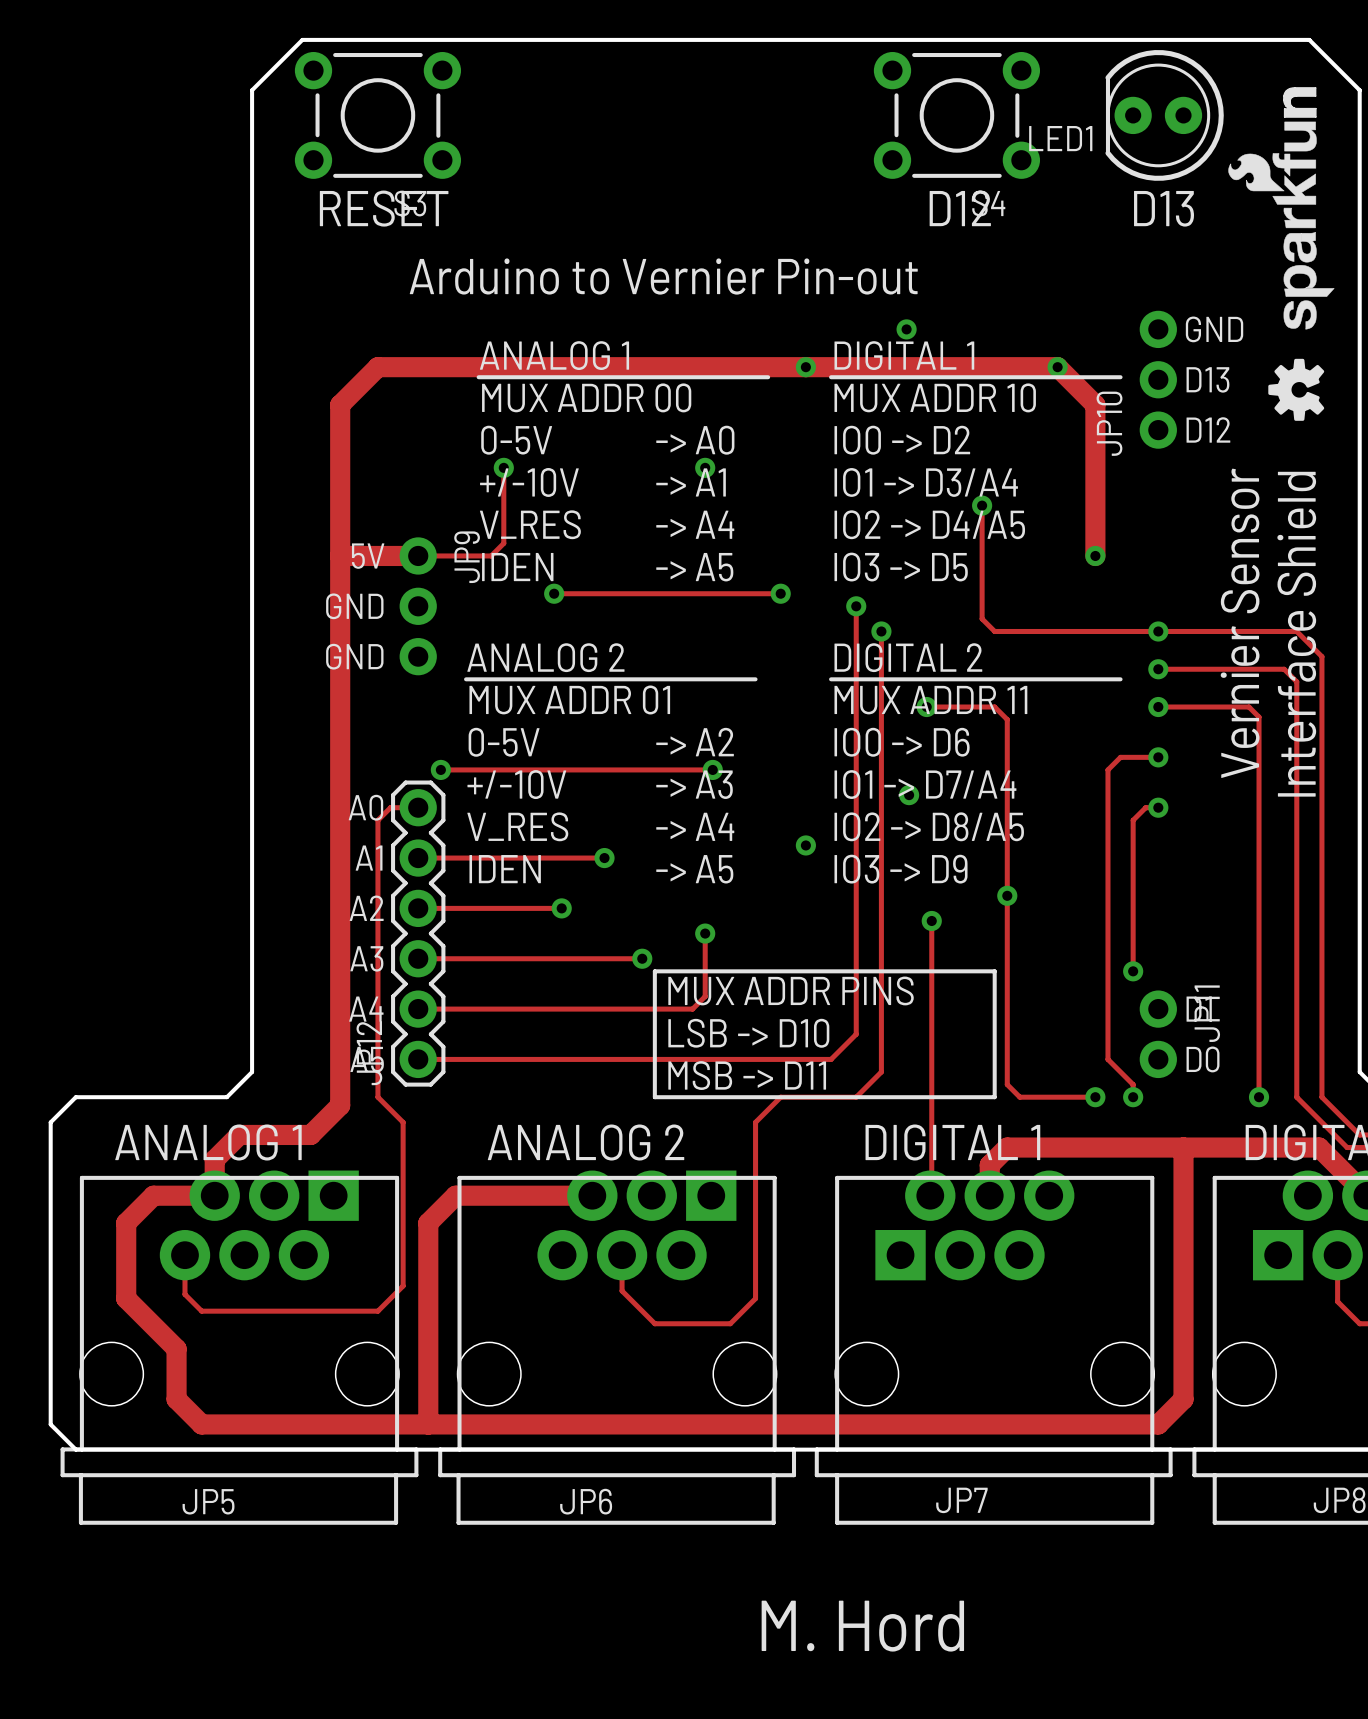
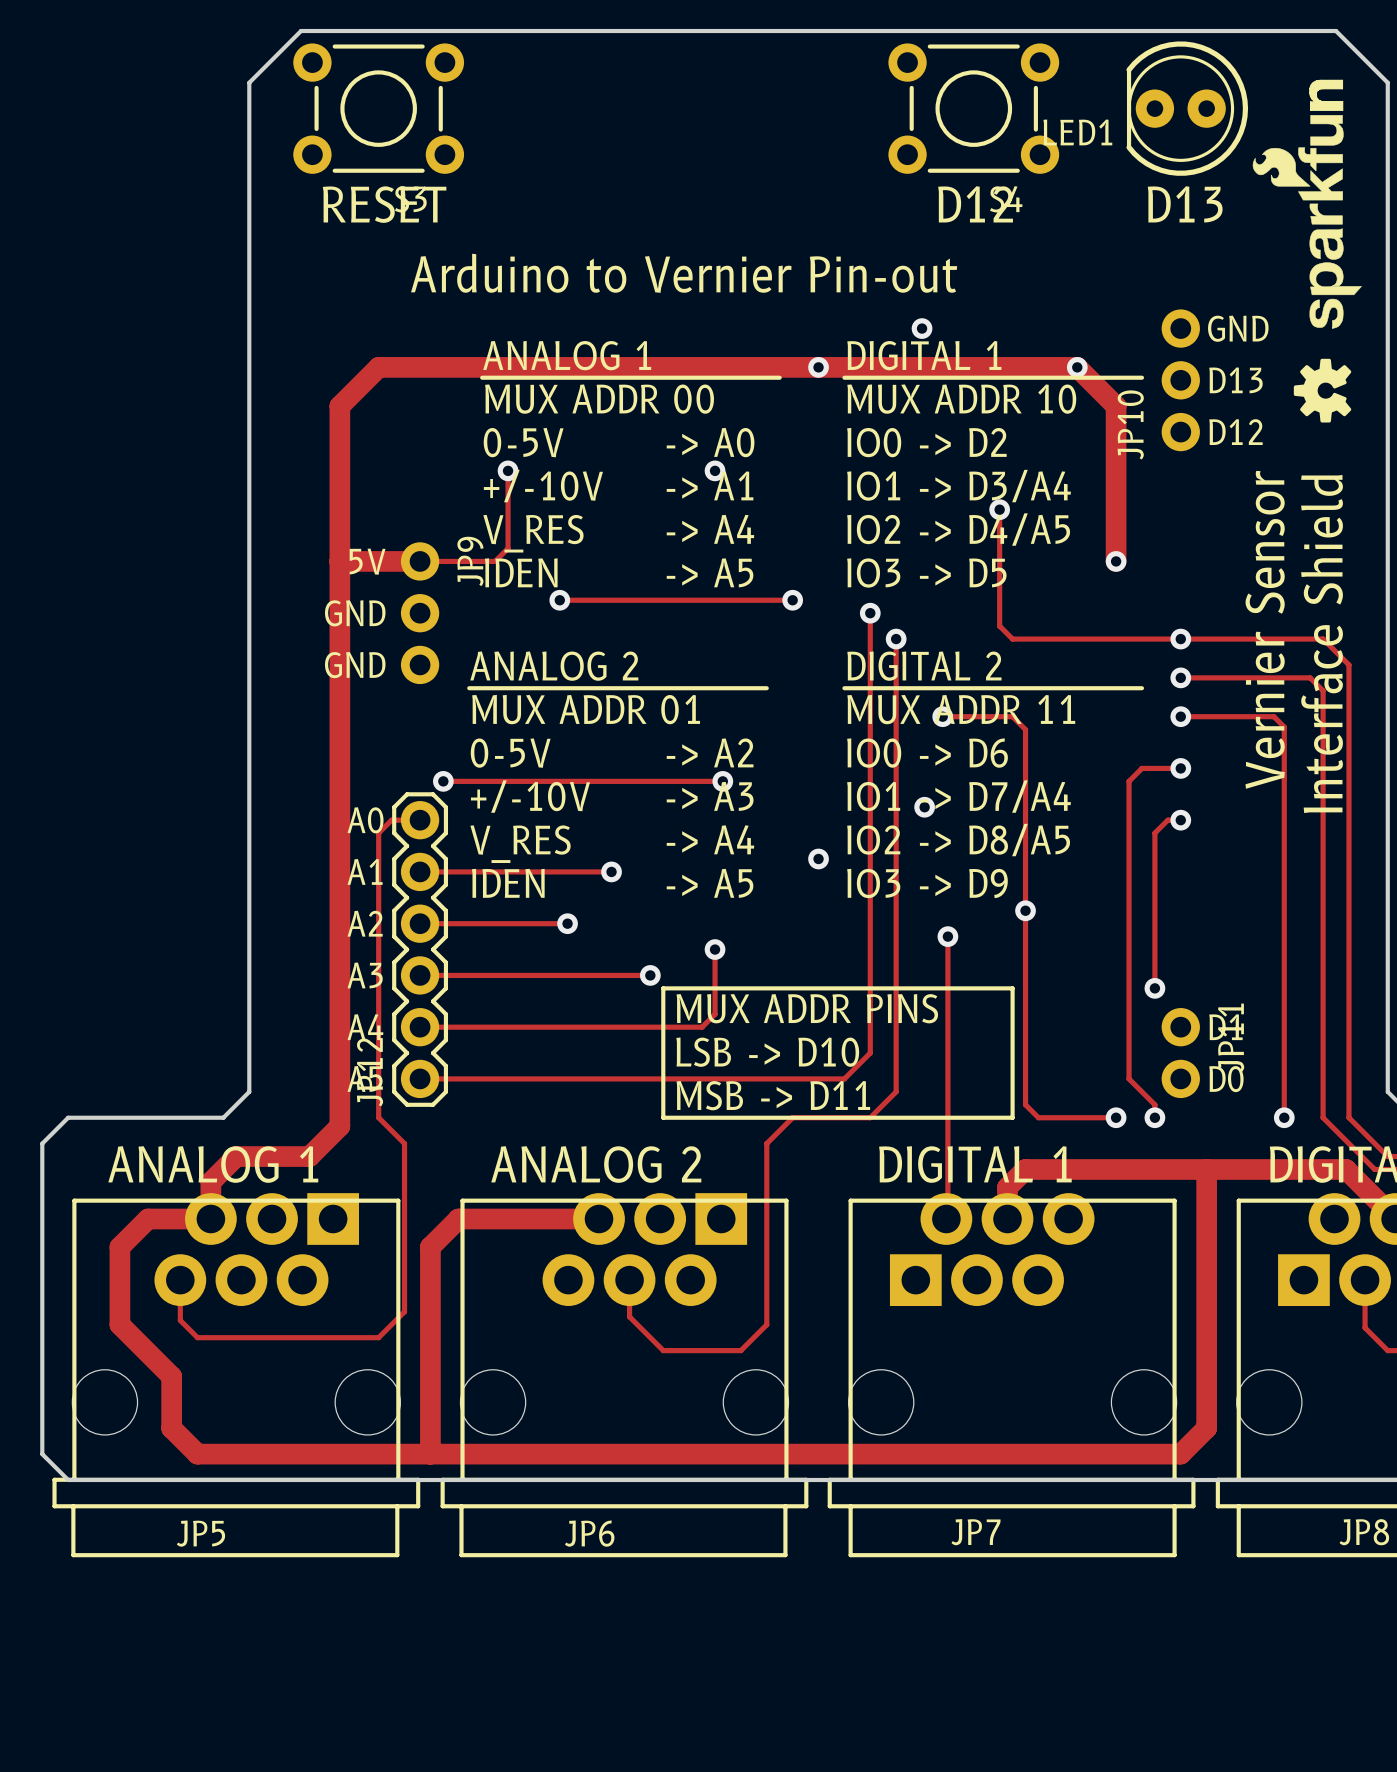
text: M. Hord (862, 1626) -> none

